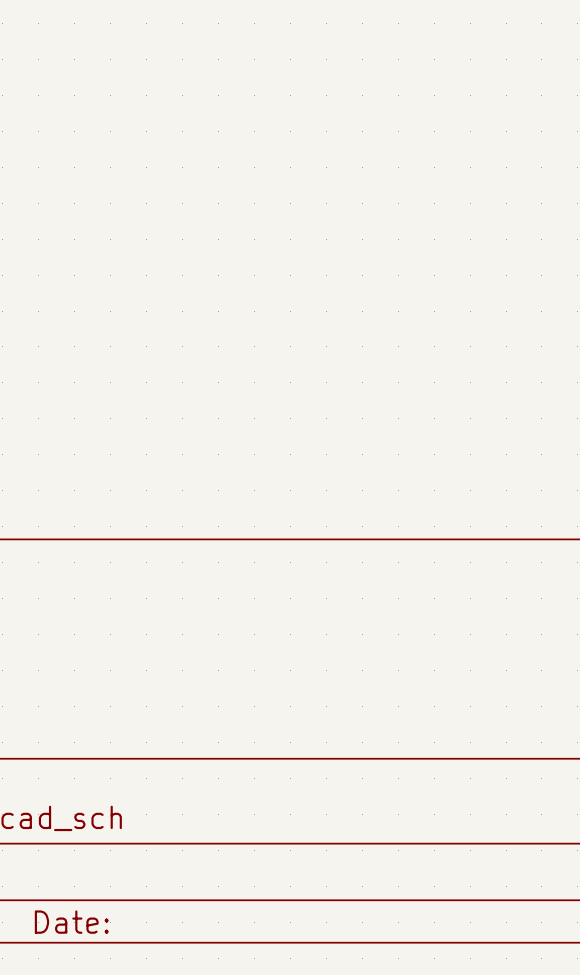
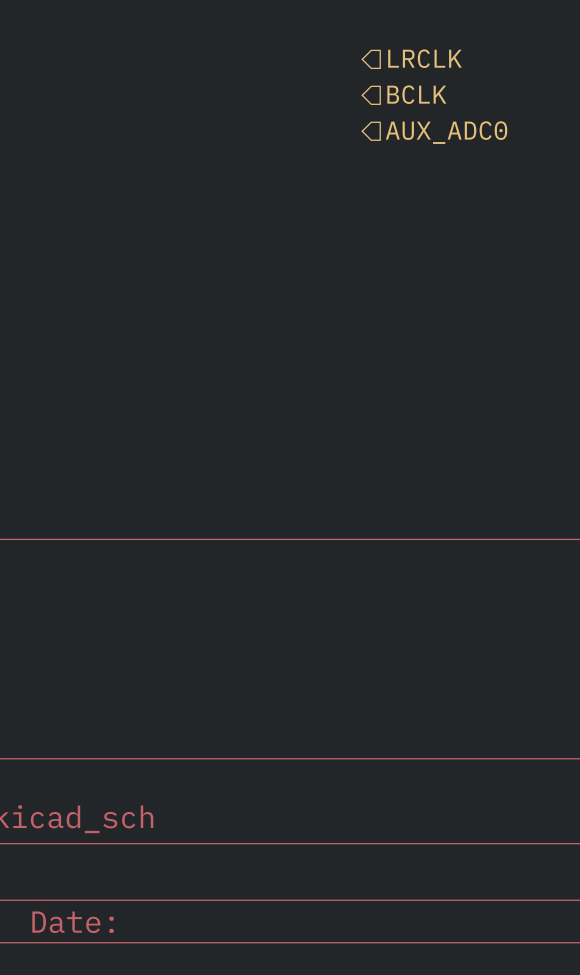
hierarchical label: none -> LRCLK (424, 58)
hierarchical label: none -> BCLK (416, 94)
hierarchical label: none -> AUX_ADC0 (446, 132)

